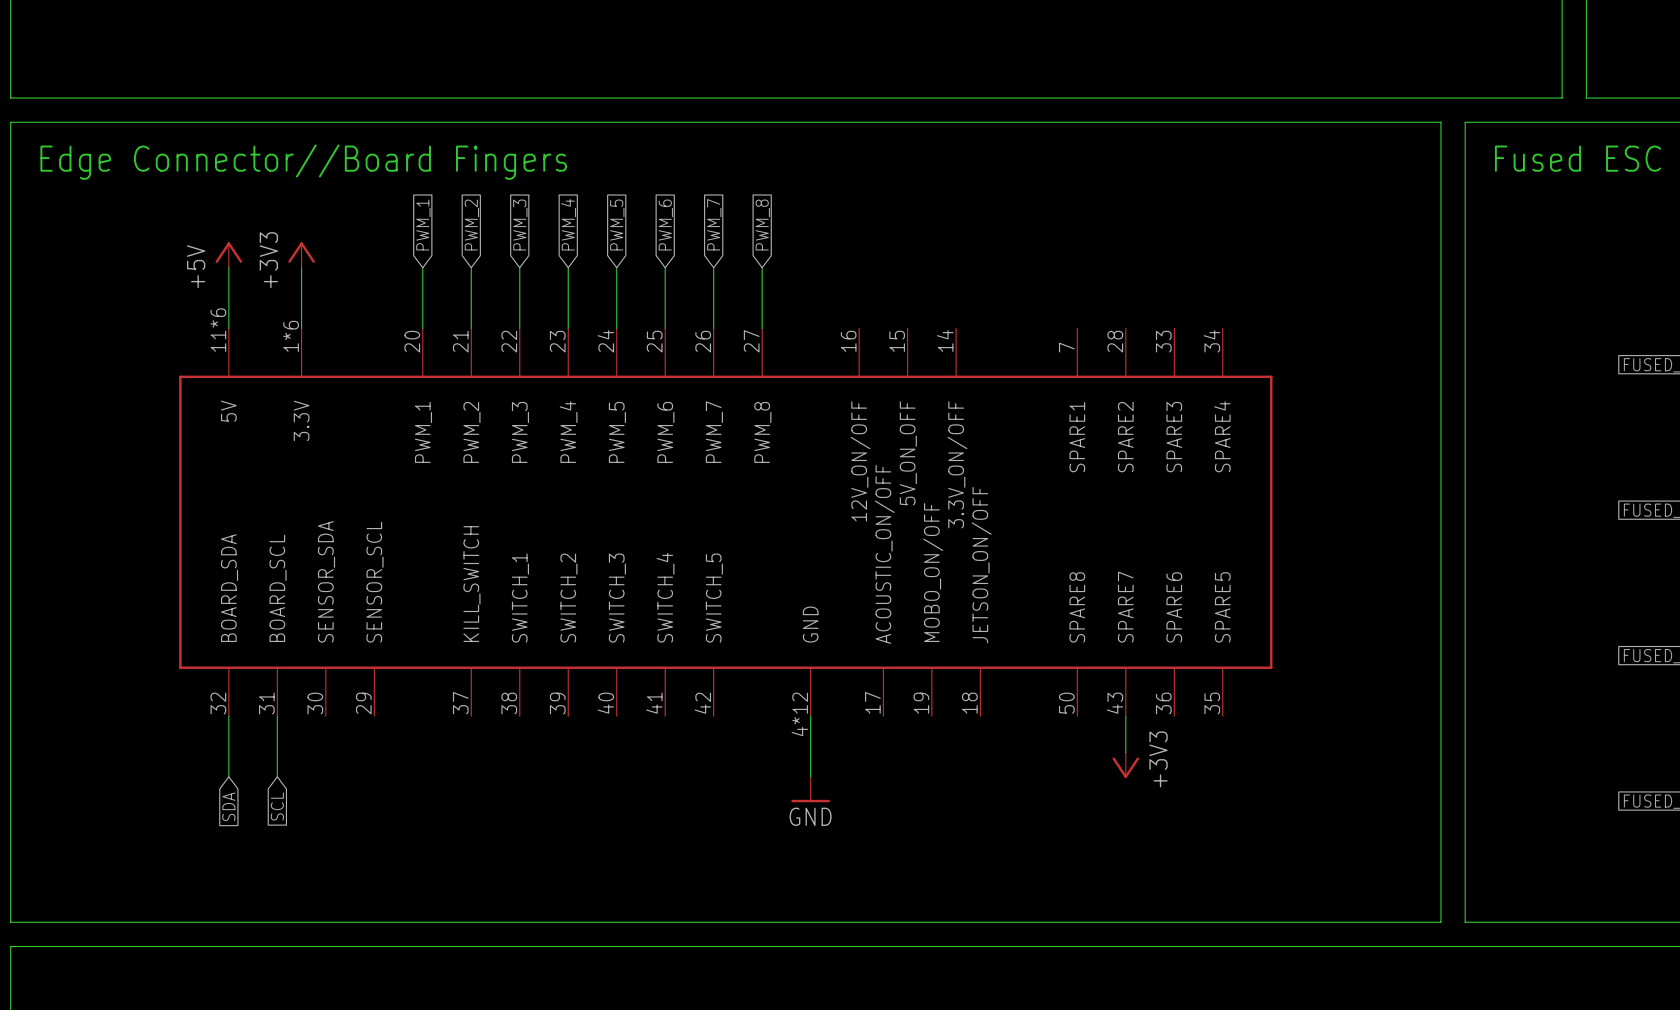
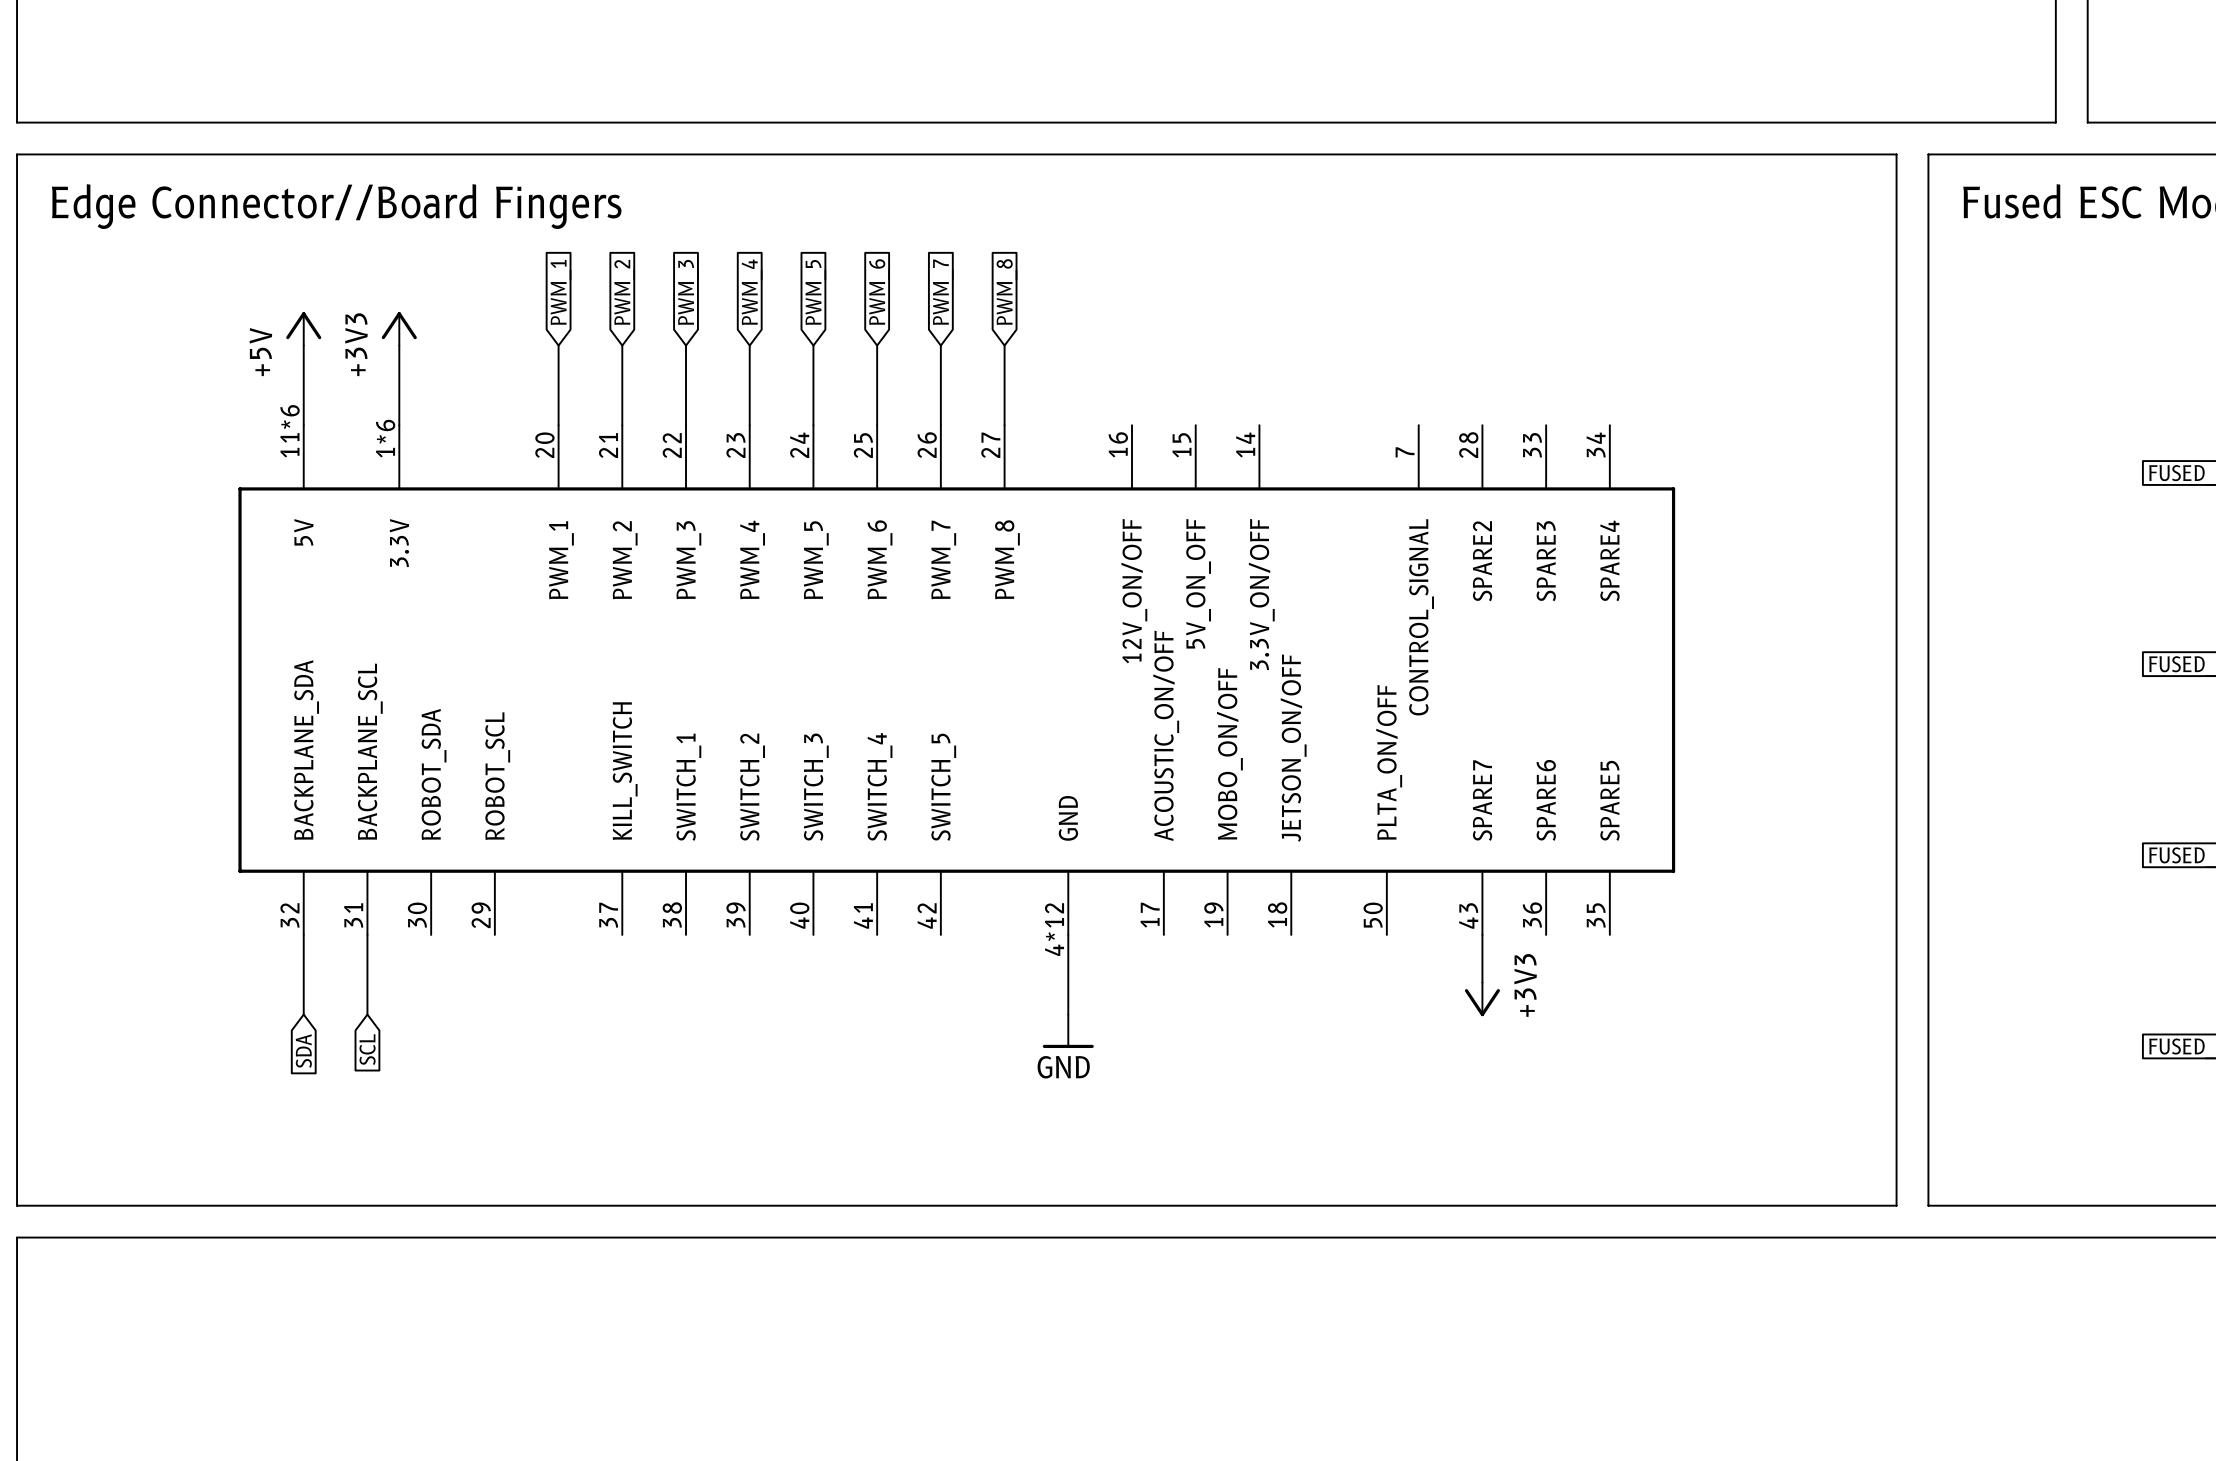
part symbol: [179, 328, 1273, 717] -> [238, 425, 1676, 935]

